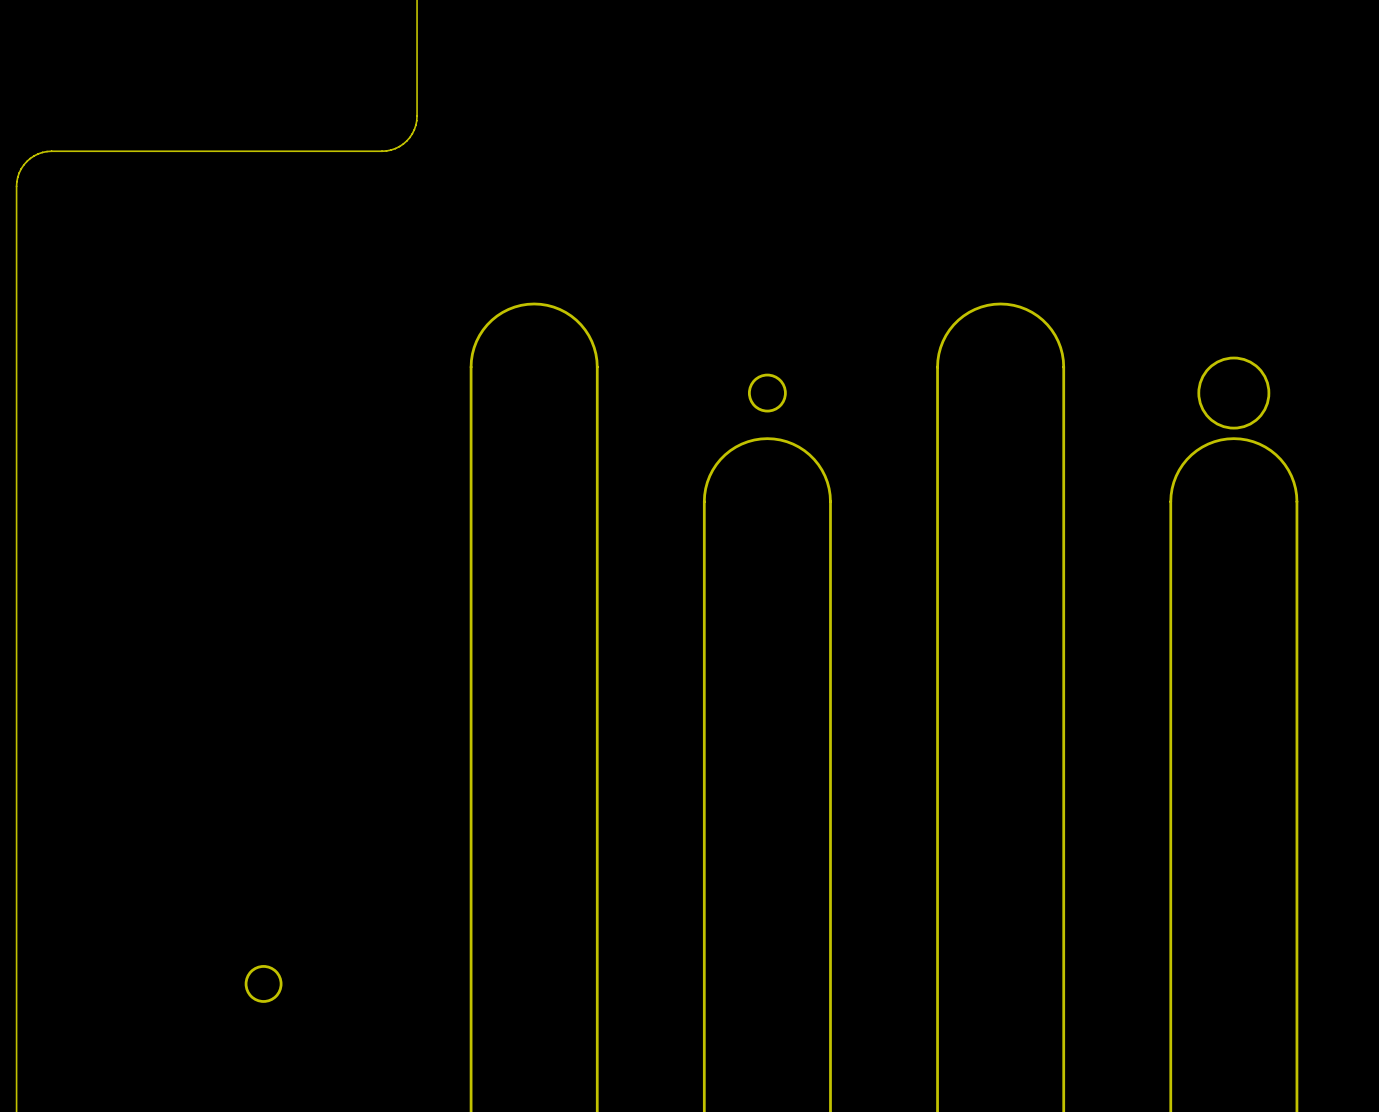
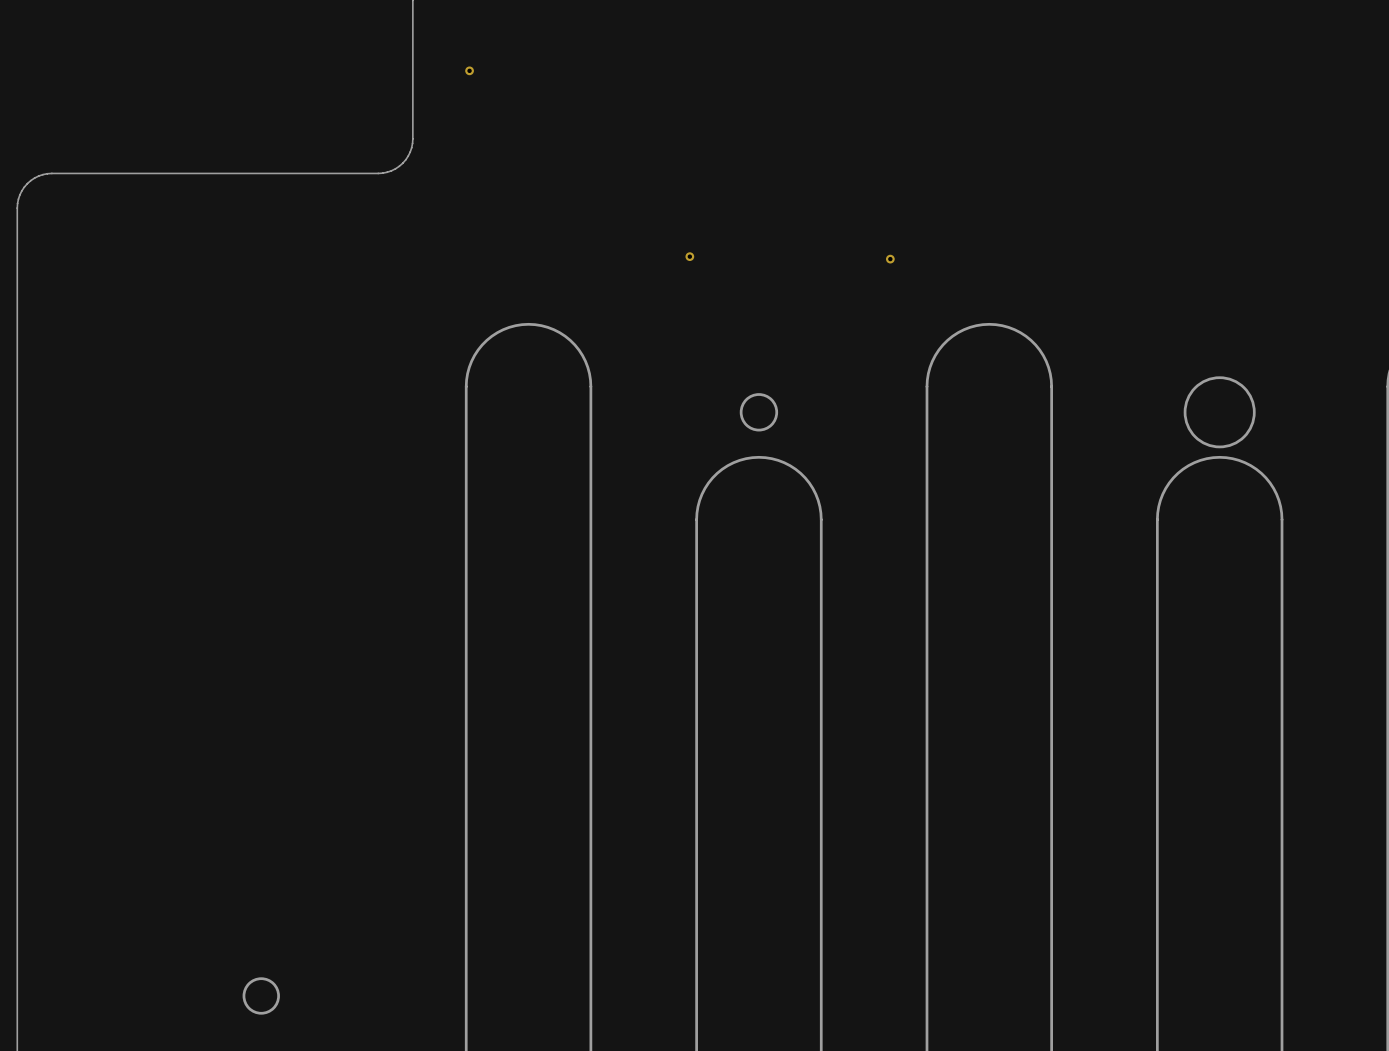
via: none -> (469, 70)
via: none -> (689, 256)
via: none -> (890, 259)

